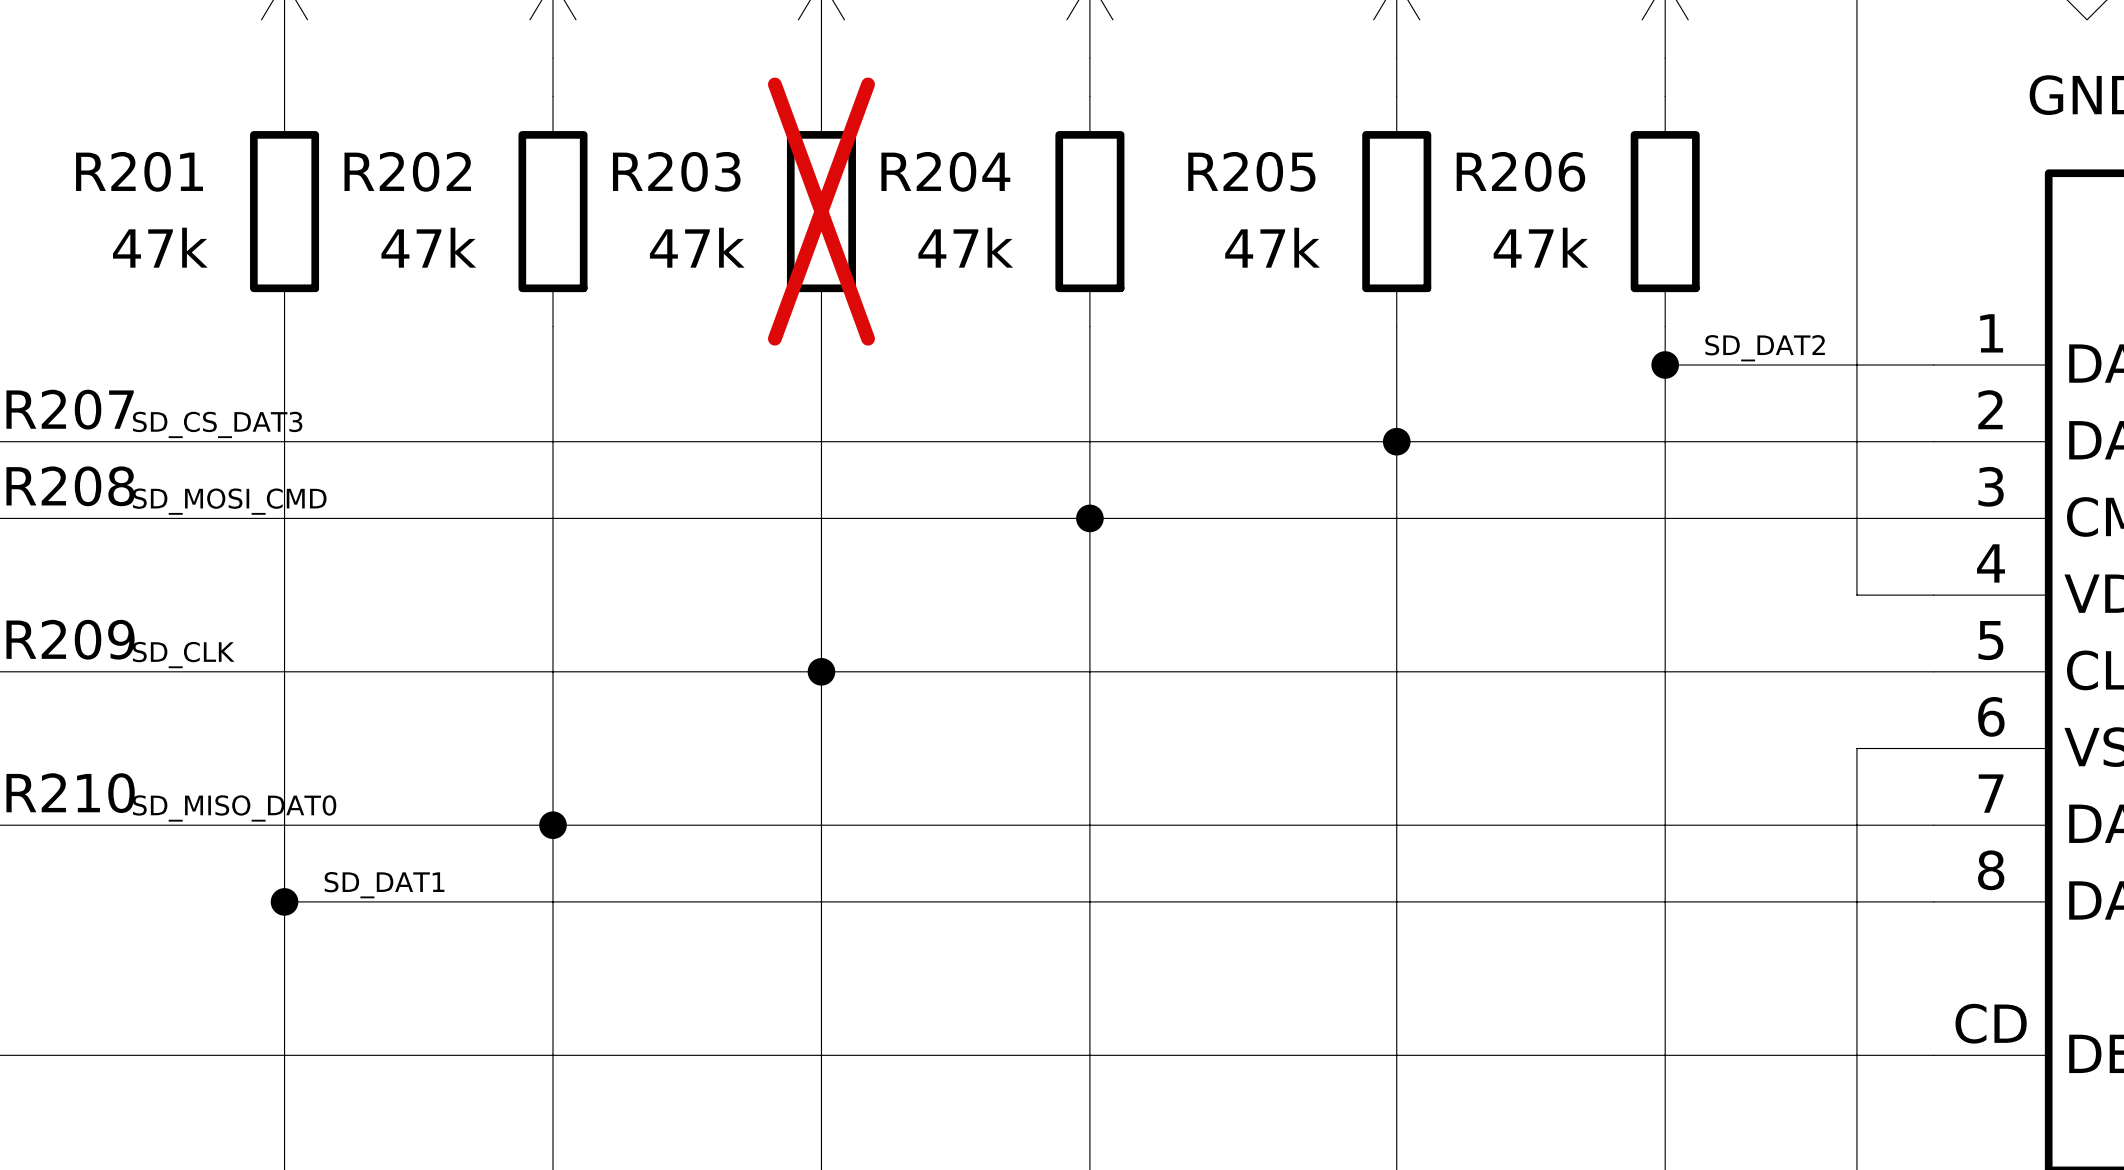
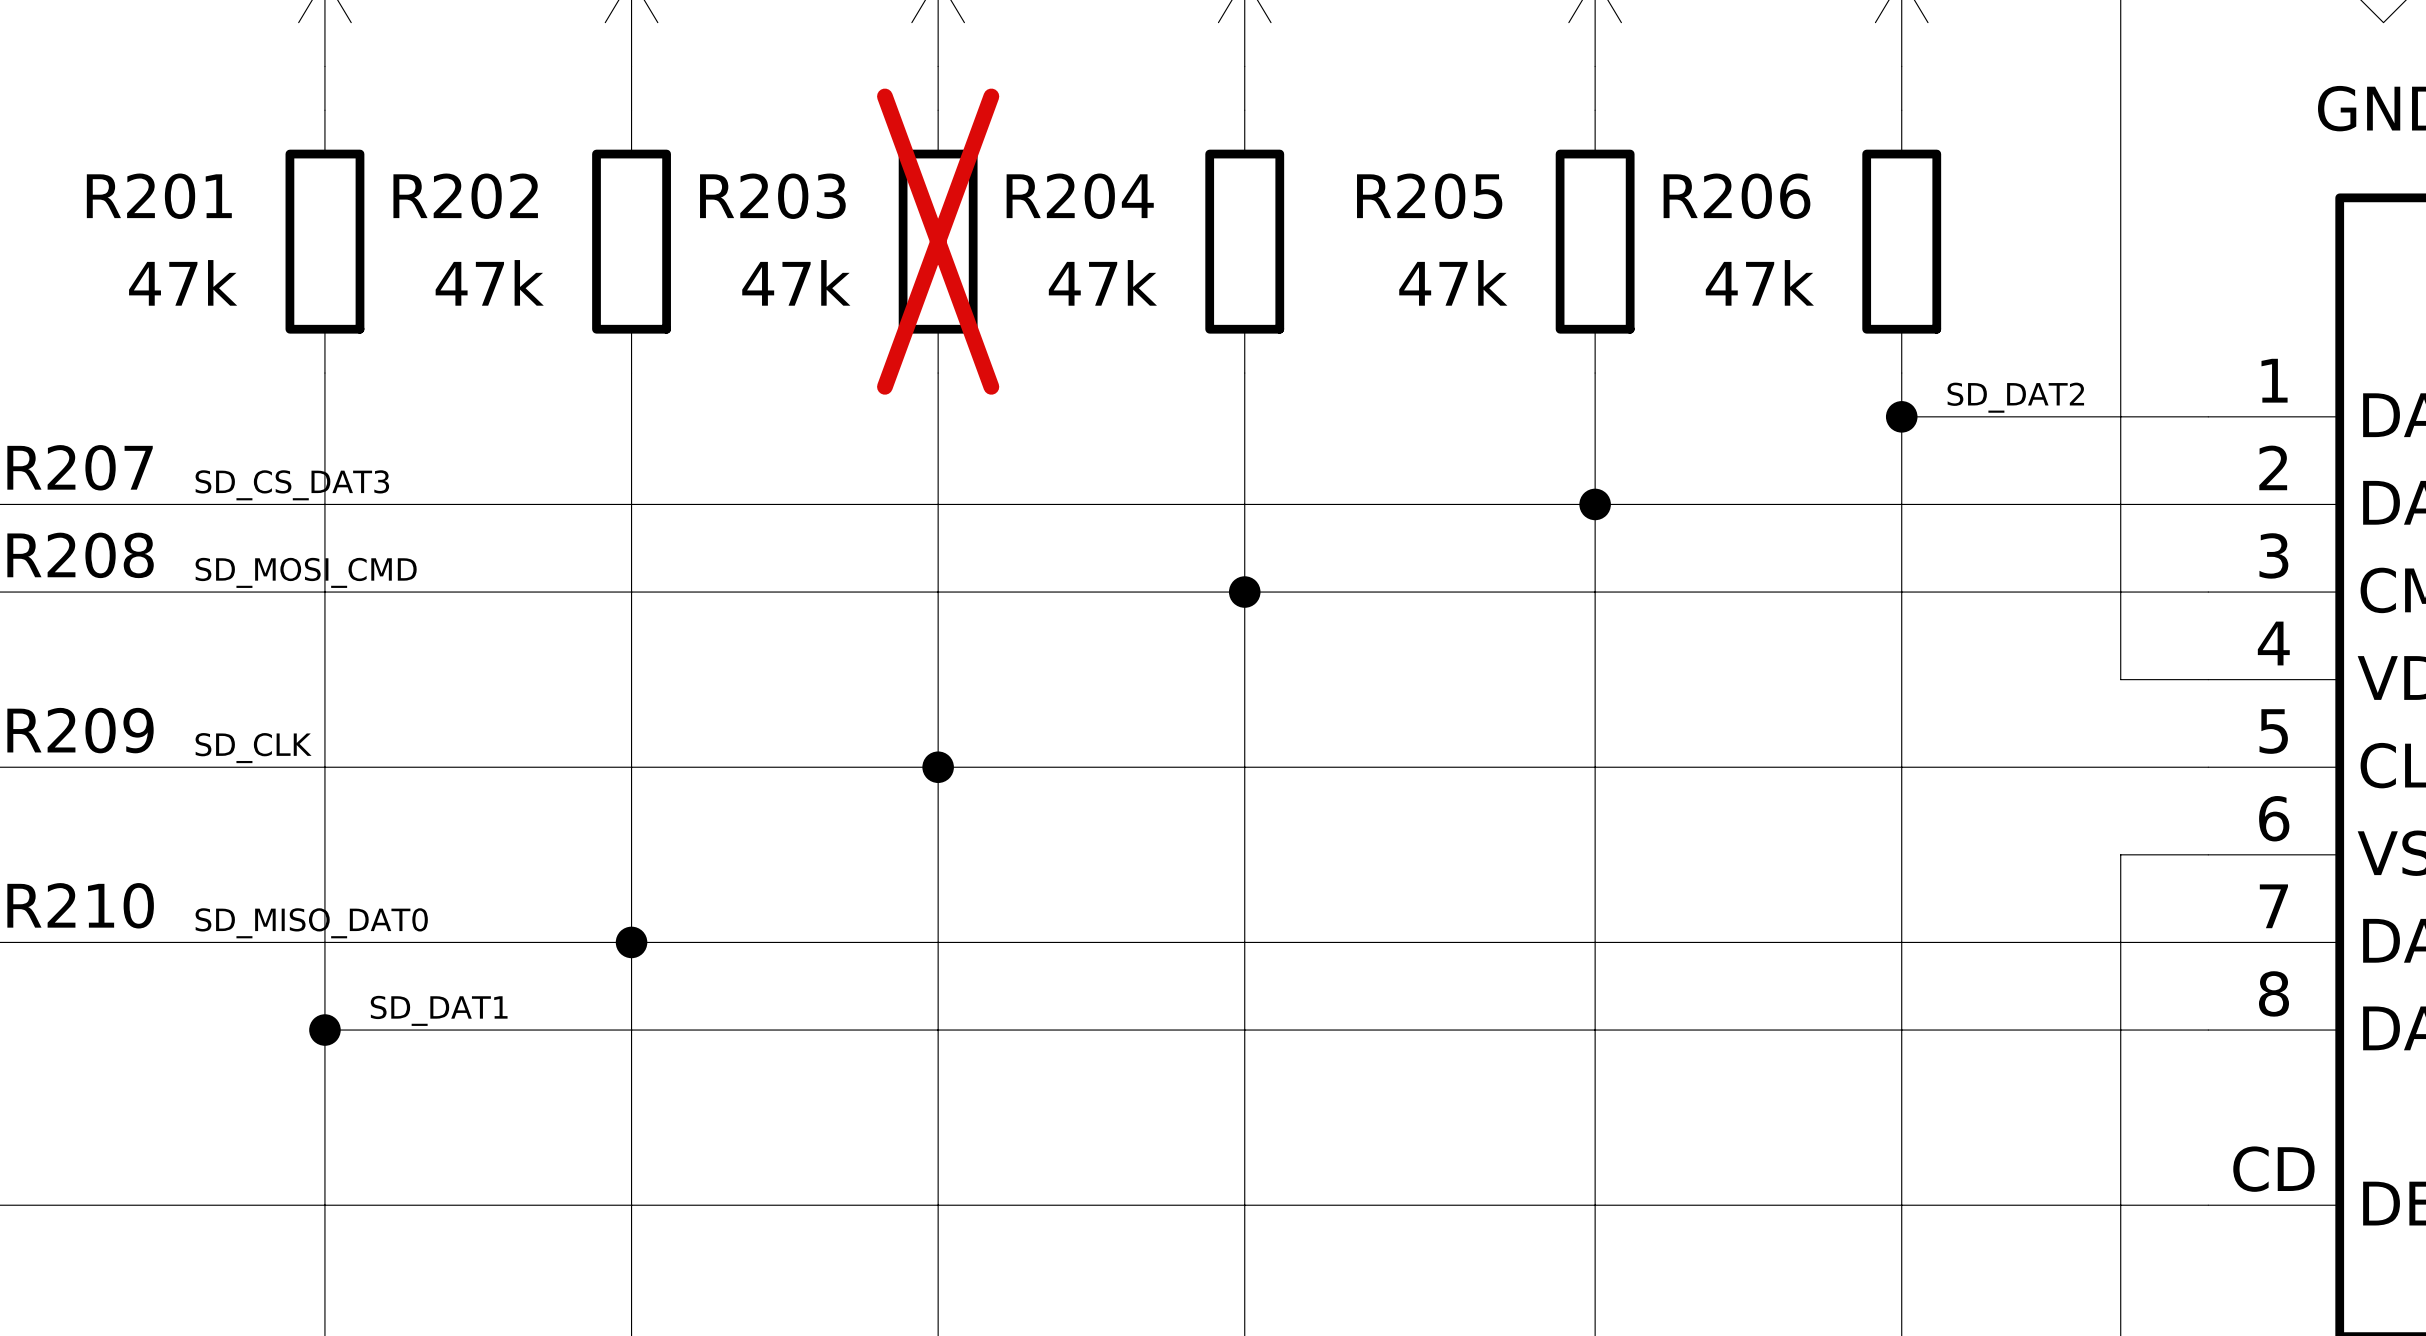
label position: SD_CS_DAT3 (217, 424) -> SD_CS_DAT3 (292, 485)
label position: SD_MOSI_CMD (229, 501) -> SD_MOSI_CMD (306, 572)
label position: SD_CLK (183, 655) -> SD_CLK (253, 748)
label position: SD_MISO_DAT0 (234, 808) -> SD_MISO_DAT0 (311, 923)

